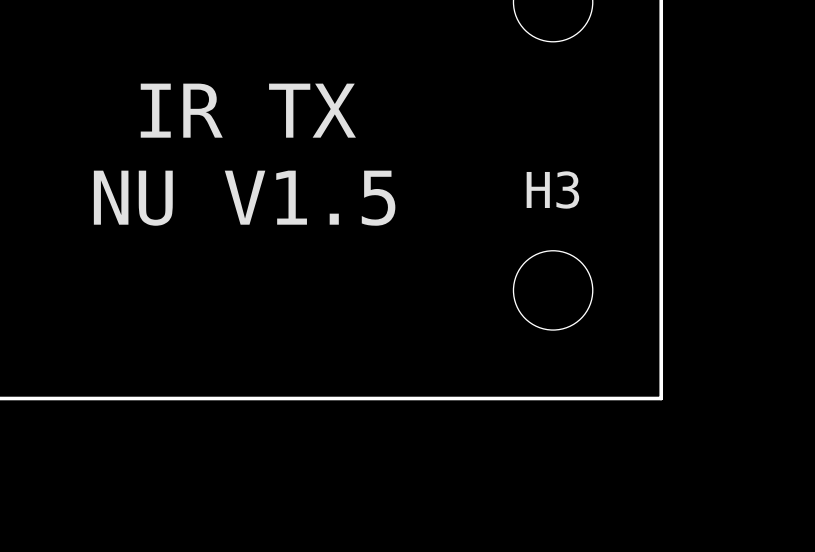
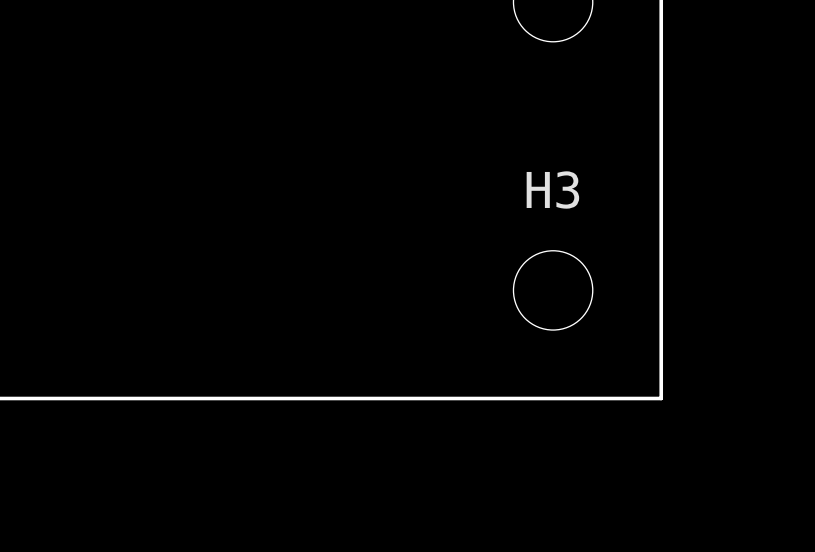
text: IR TX (248, 110) -> none
text: NU V1.5 (244, 198) -> none

